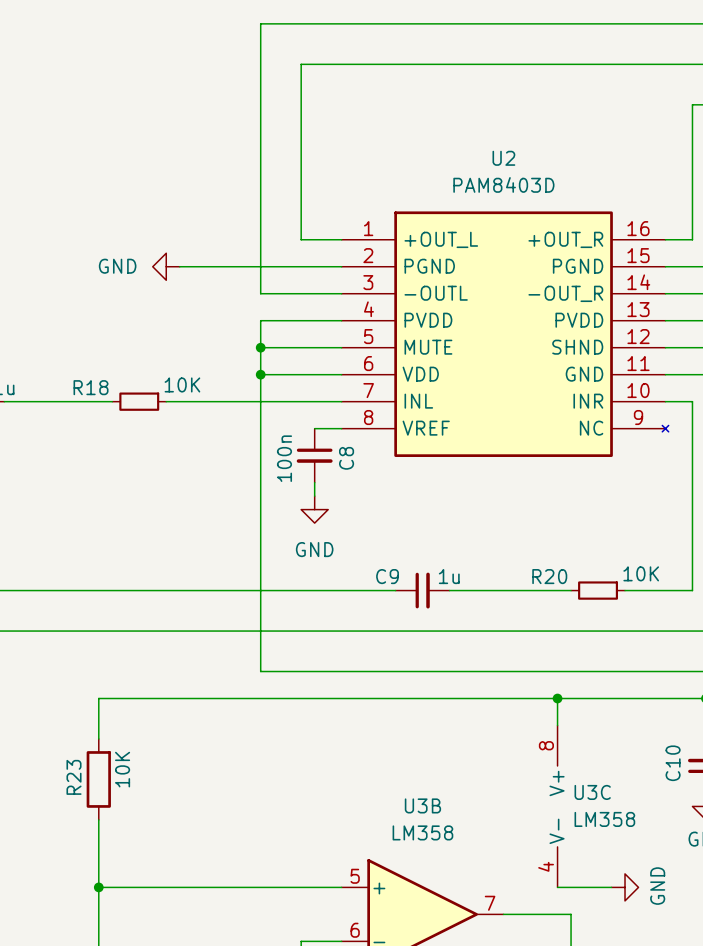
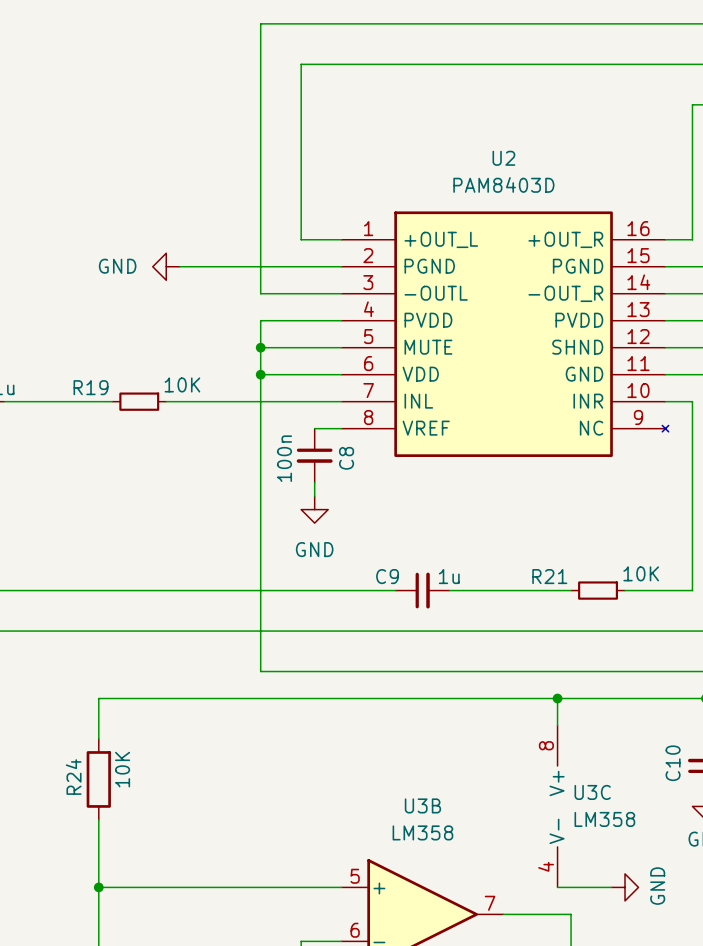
R18 name: R18 (91, 387) -> R19 (91, 387)
R20 name: R20 (549, 576) -> R21 (549, 576)
R23 name: R23 (74, 777) -> R24 (73, 777)

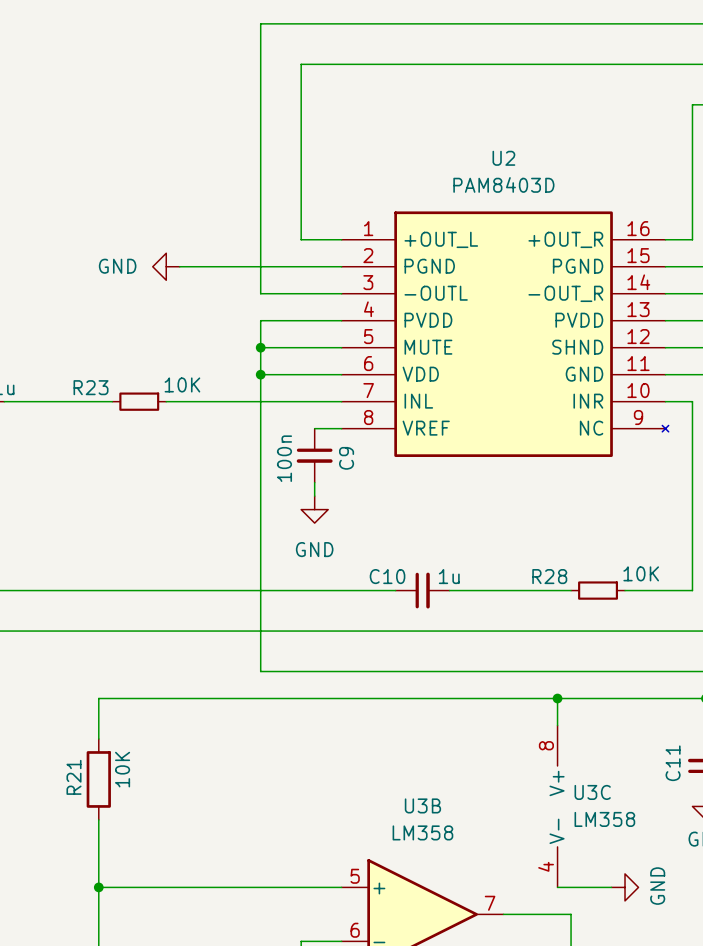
R19 name: R19 (91, 387) -> R23 (91, 387)
C8 name: C8 (346, 458) -> C9 (346, 458)
C9 name: C9 (387, 576) -> C10 (387, 576)
R21 name: R21 (549, 576) -> R28 (549, 576)
C10 name: C10 (673, 763) -> C11 (673, 763)
R24 name: R24 (73, 777) -> R21 (74, 777)

